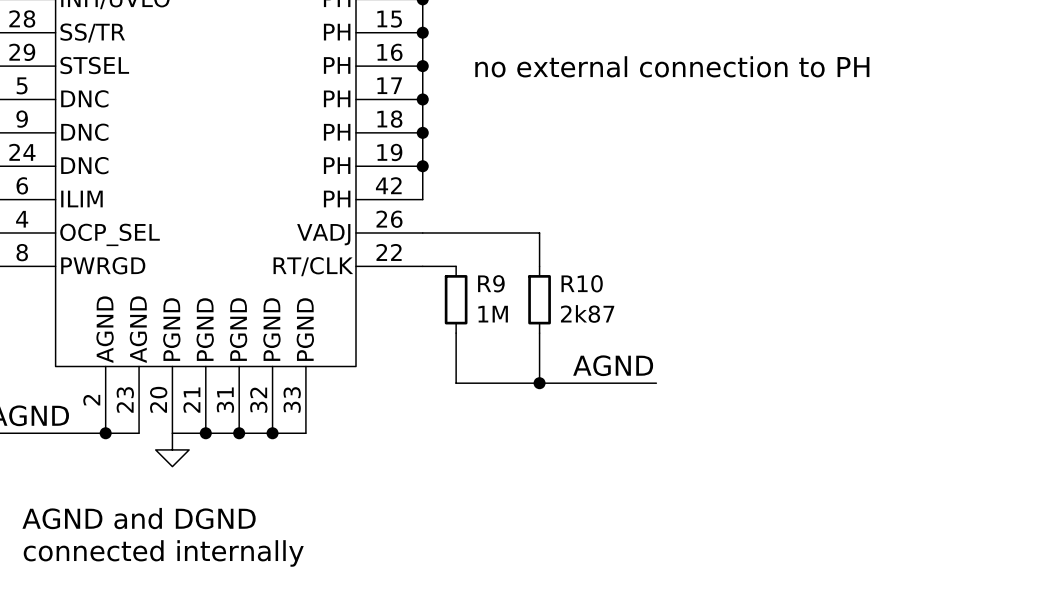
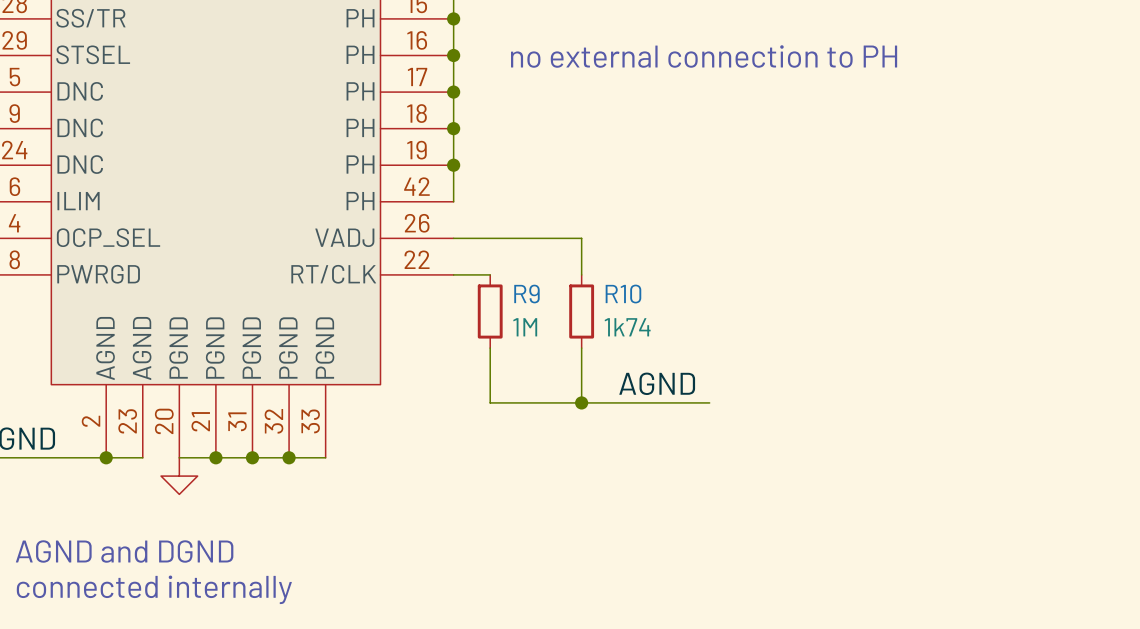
R10 value: 2k87 (587, 313) -> 1k74 (627, 327)

